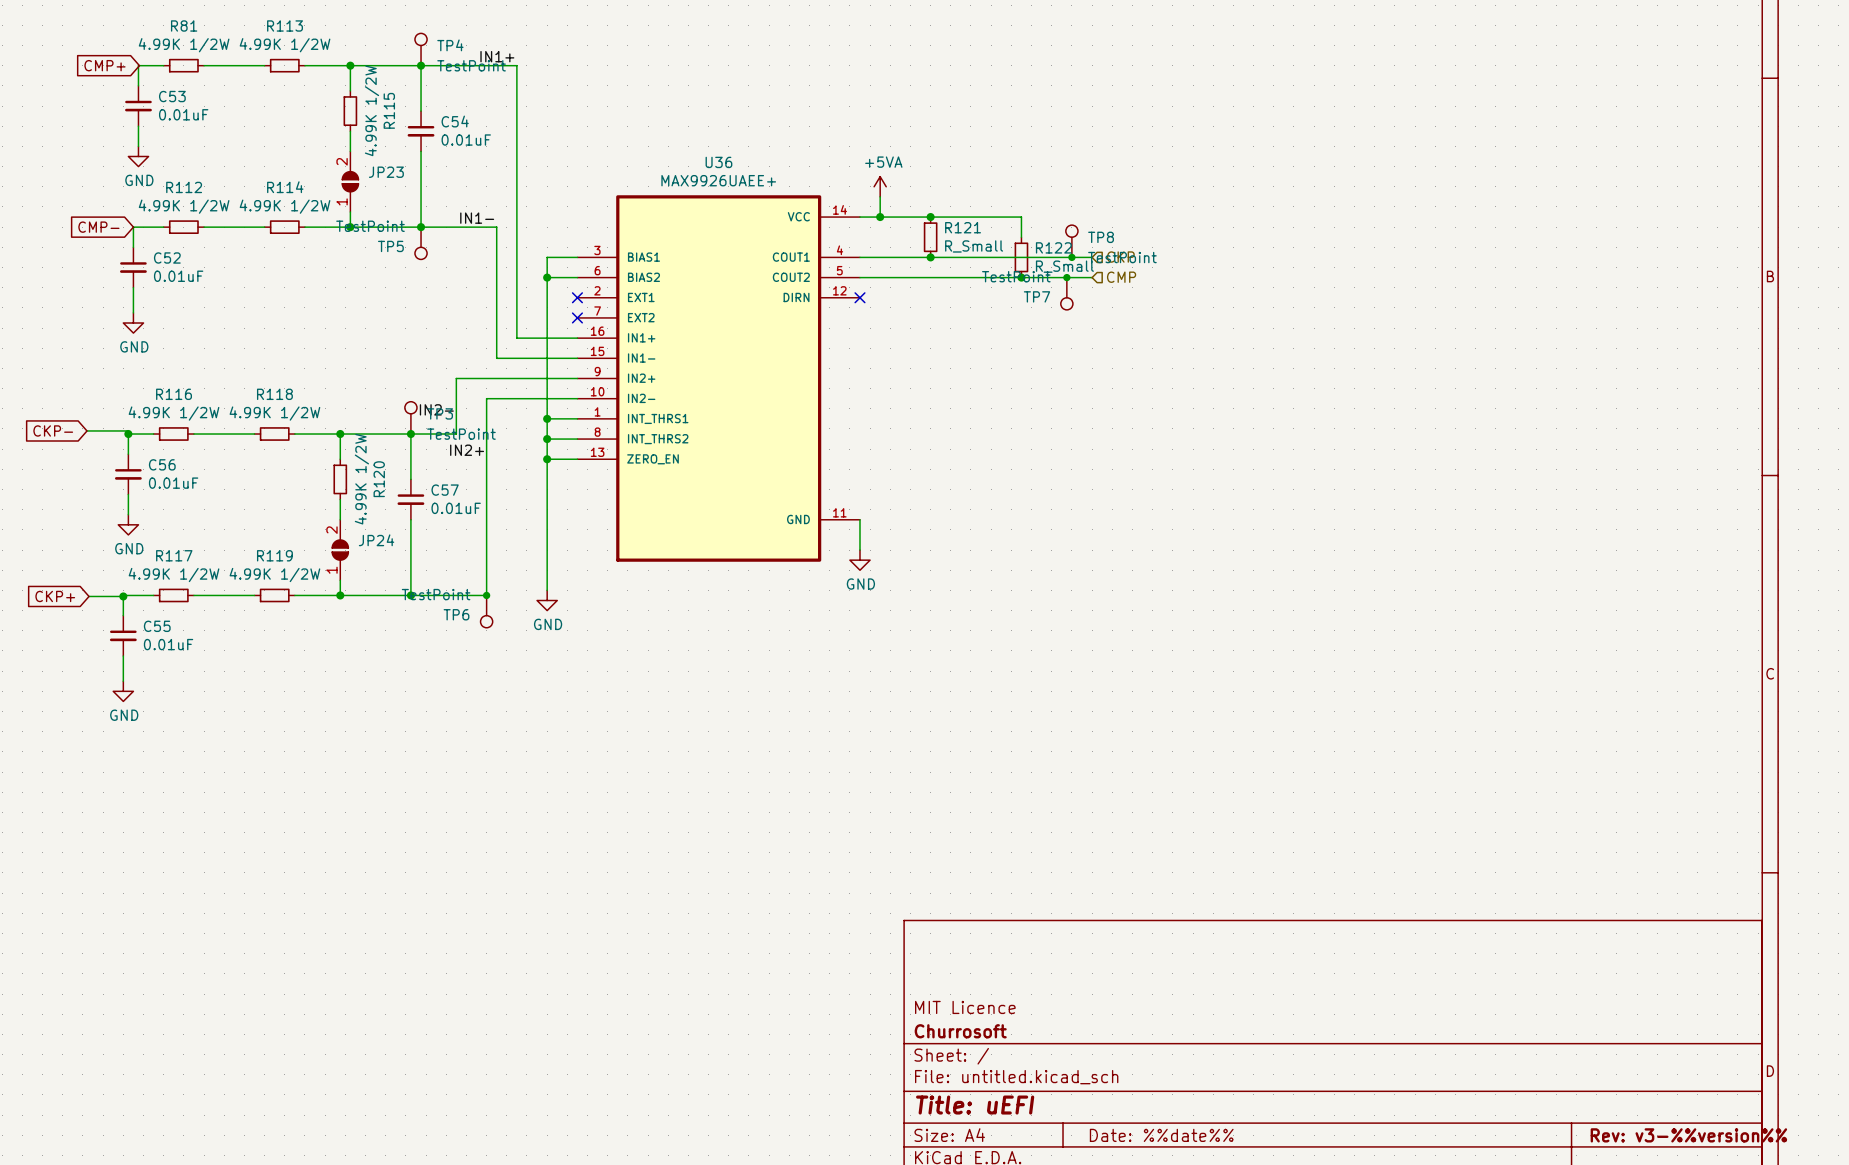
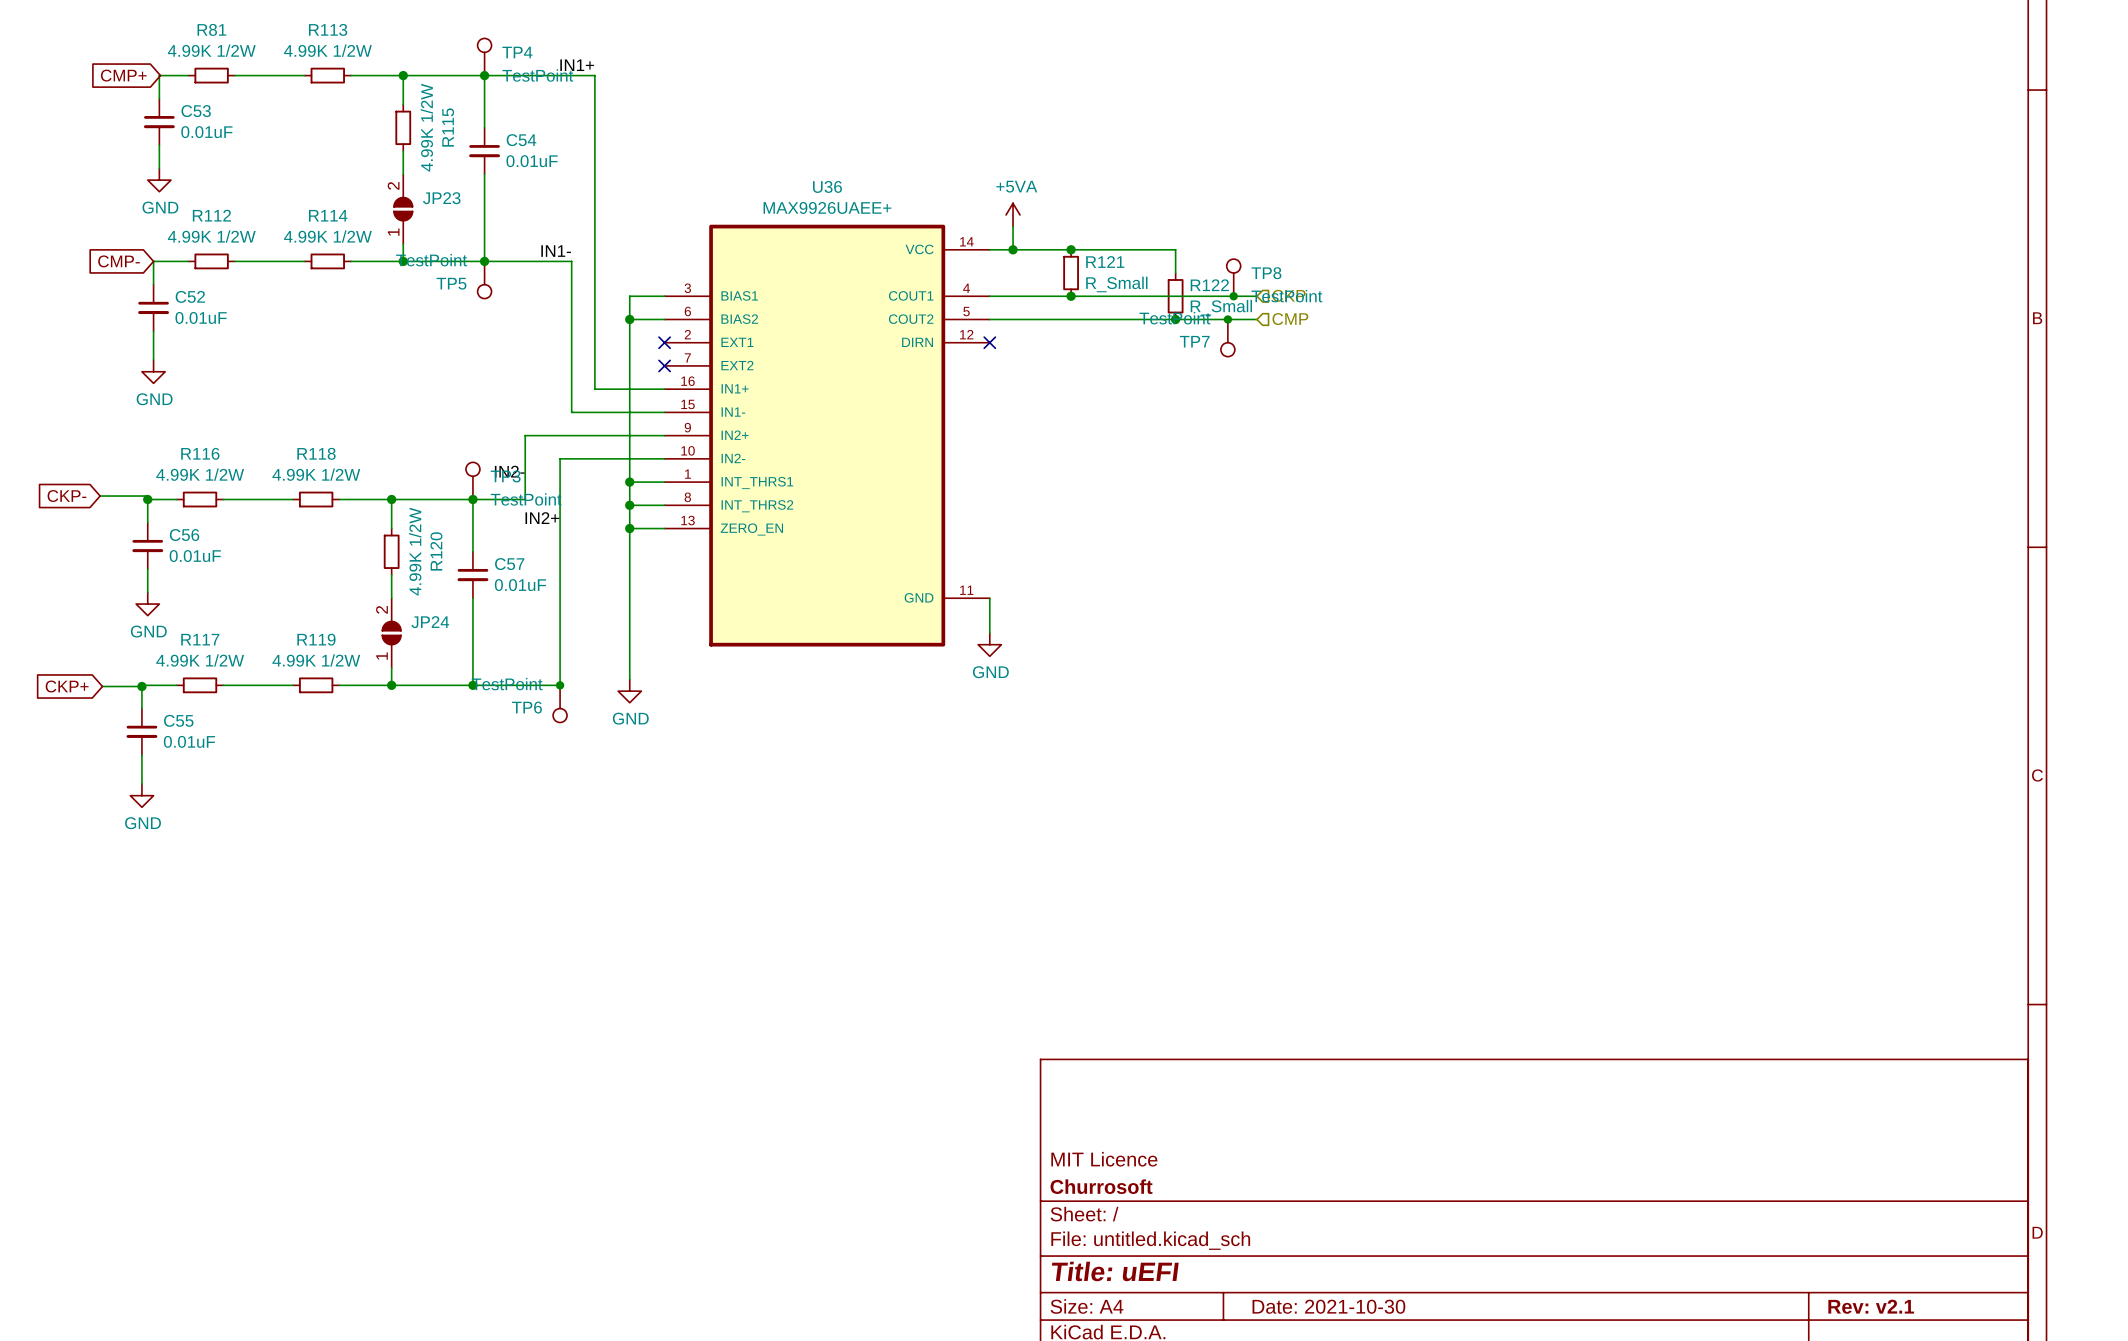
title block: Date: %%date%% (1161, 1135) -> Date: 2021-10-30 (1328, 1306)
title block: Rev: v3-%%version%% (1688, 1135) -> Rev: v2.1 (1871, 1306)

